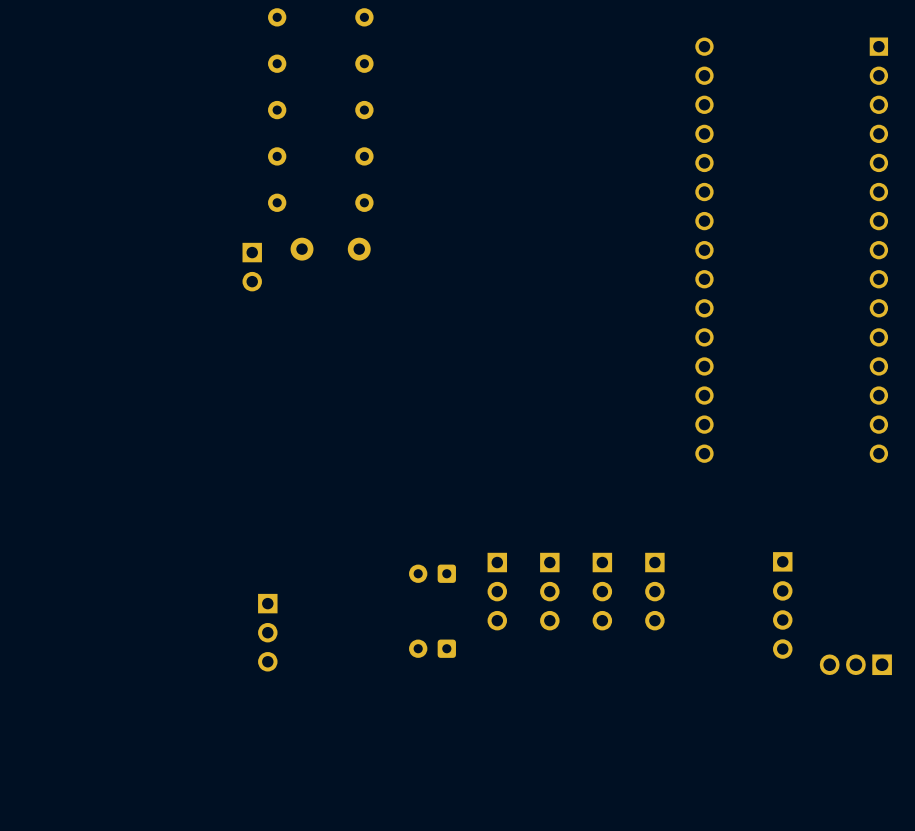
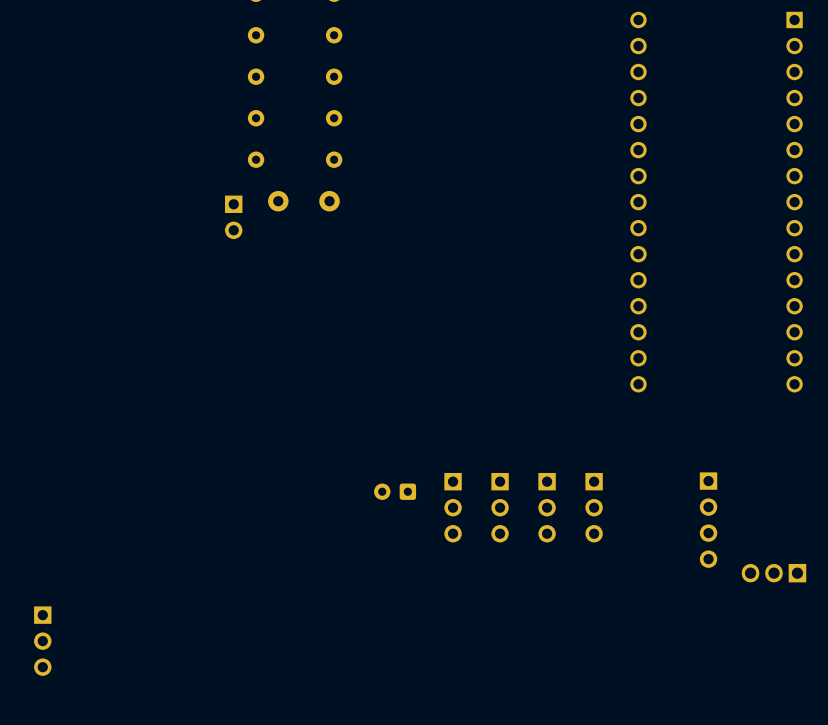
part position: (267, 632) -> (42, 641)
part: (432, 648) -> none

